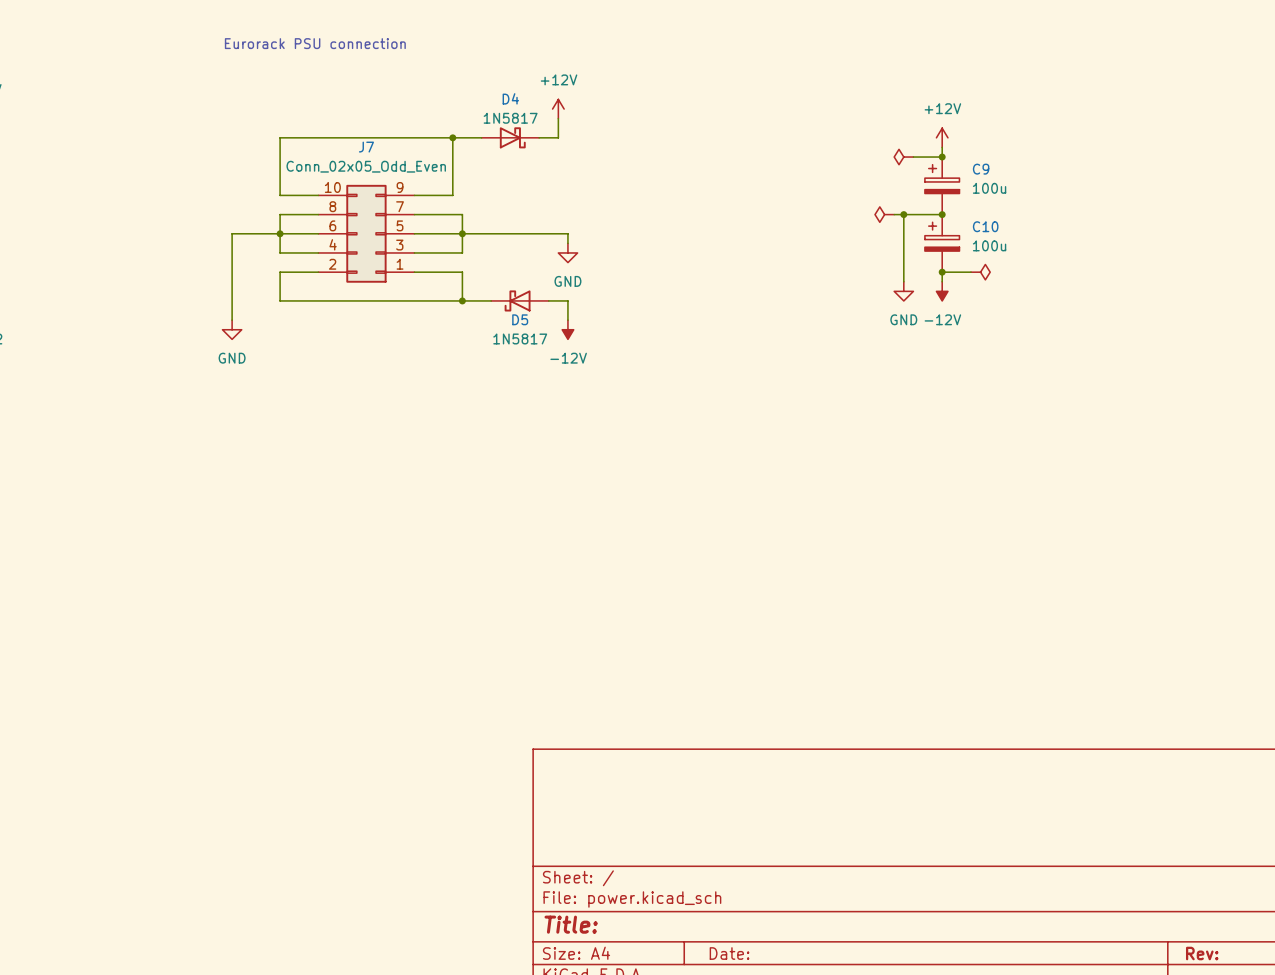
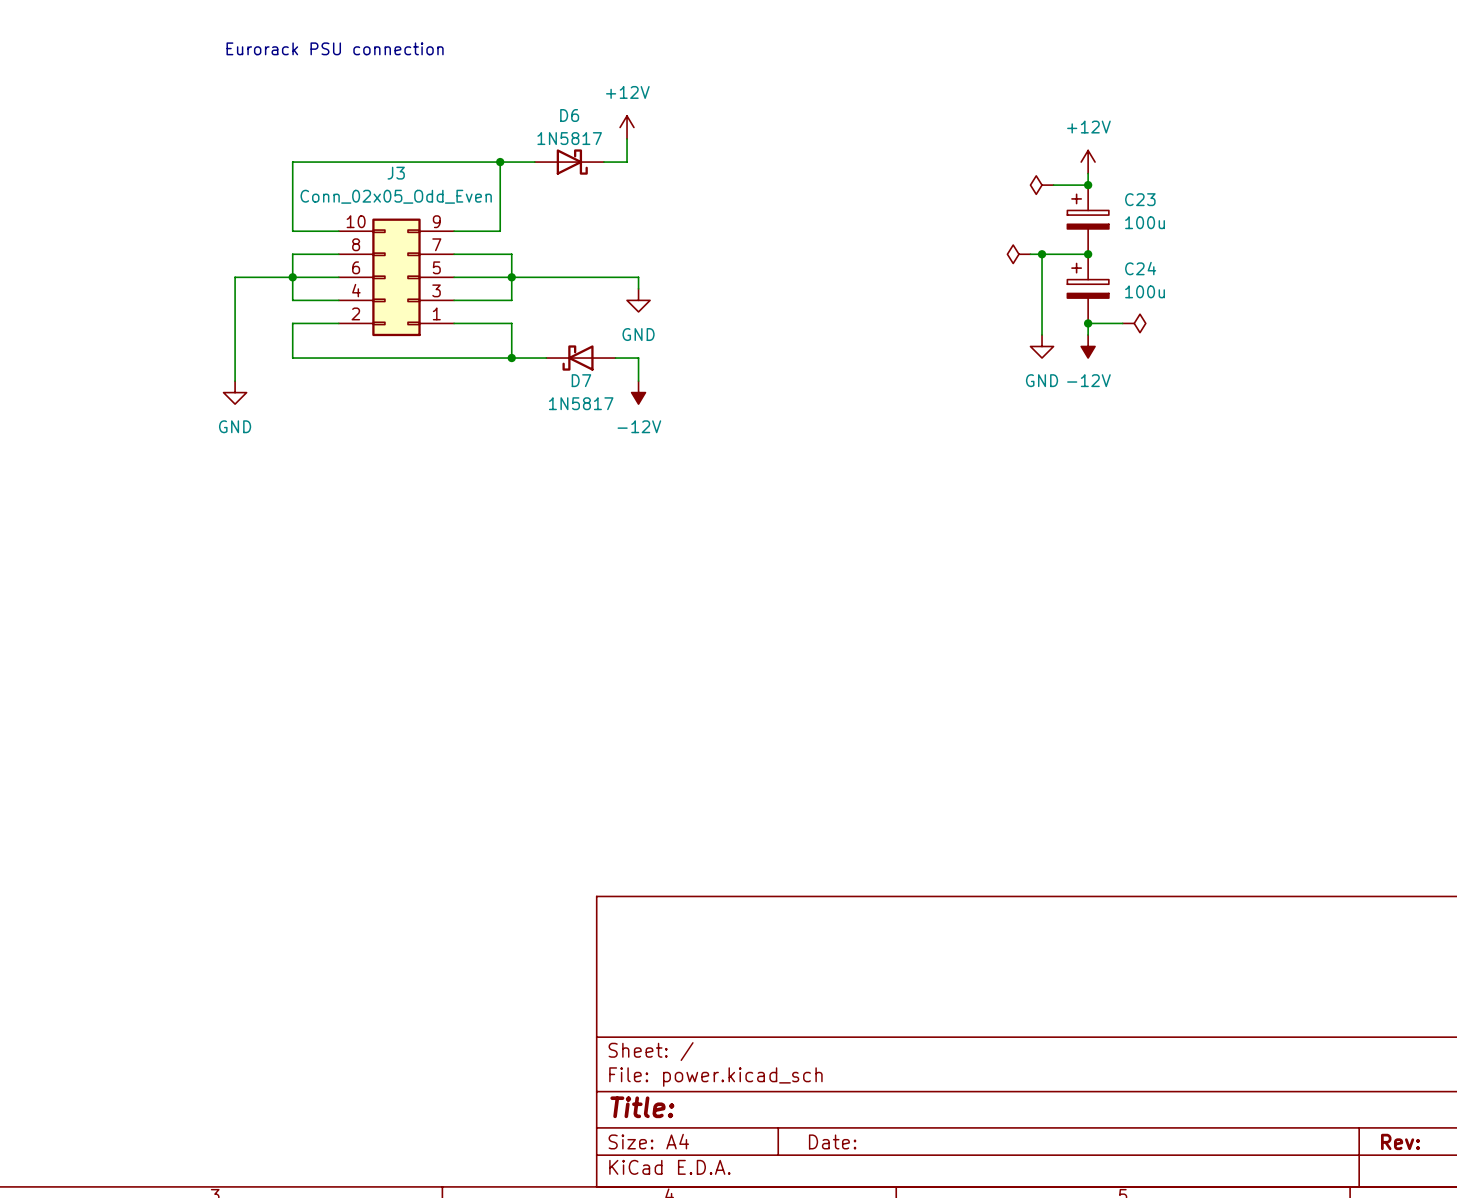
D4 name: D4 (510, 98) -> D6 (569, 115)
J7 name: J7 (366, 147) -> J3 (396, 173)
C9 name: C9 (981, 169) -> C23 (1140, 199)
C10 name: C10 (985, 226) -> C24 (1140, 268)
D5 name: D5 (520, 319) -> D7 (581, 380)

